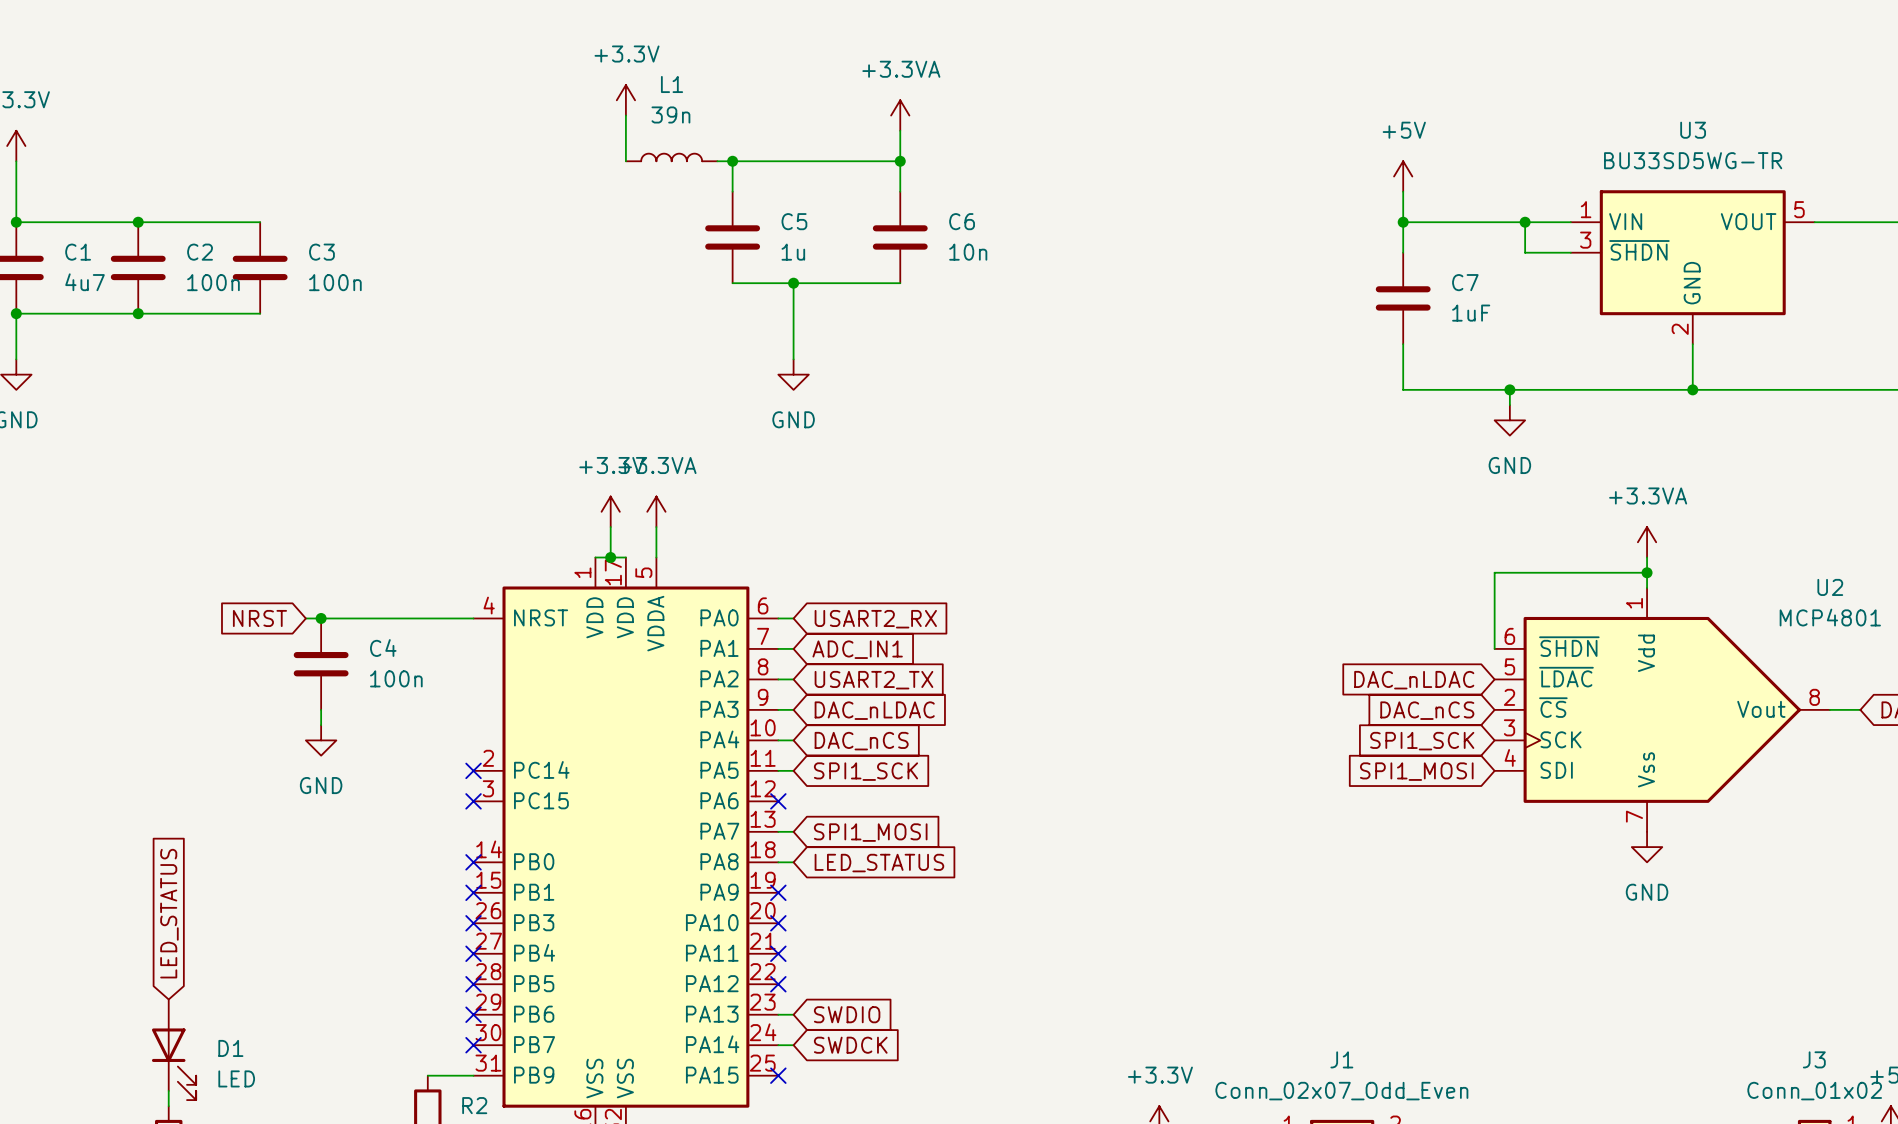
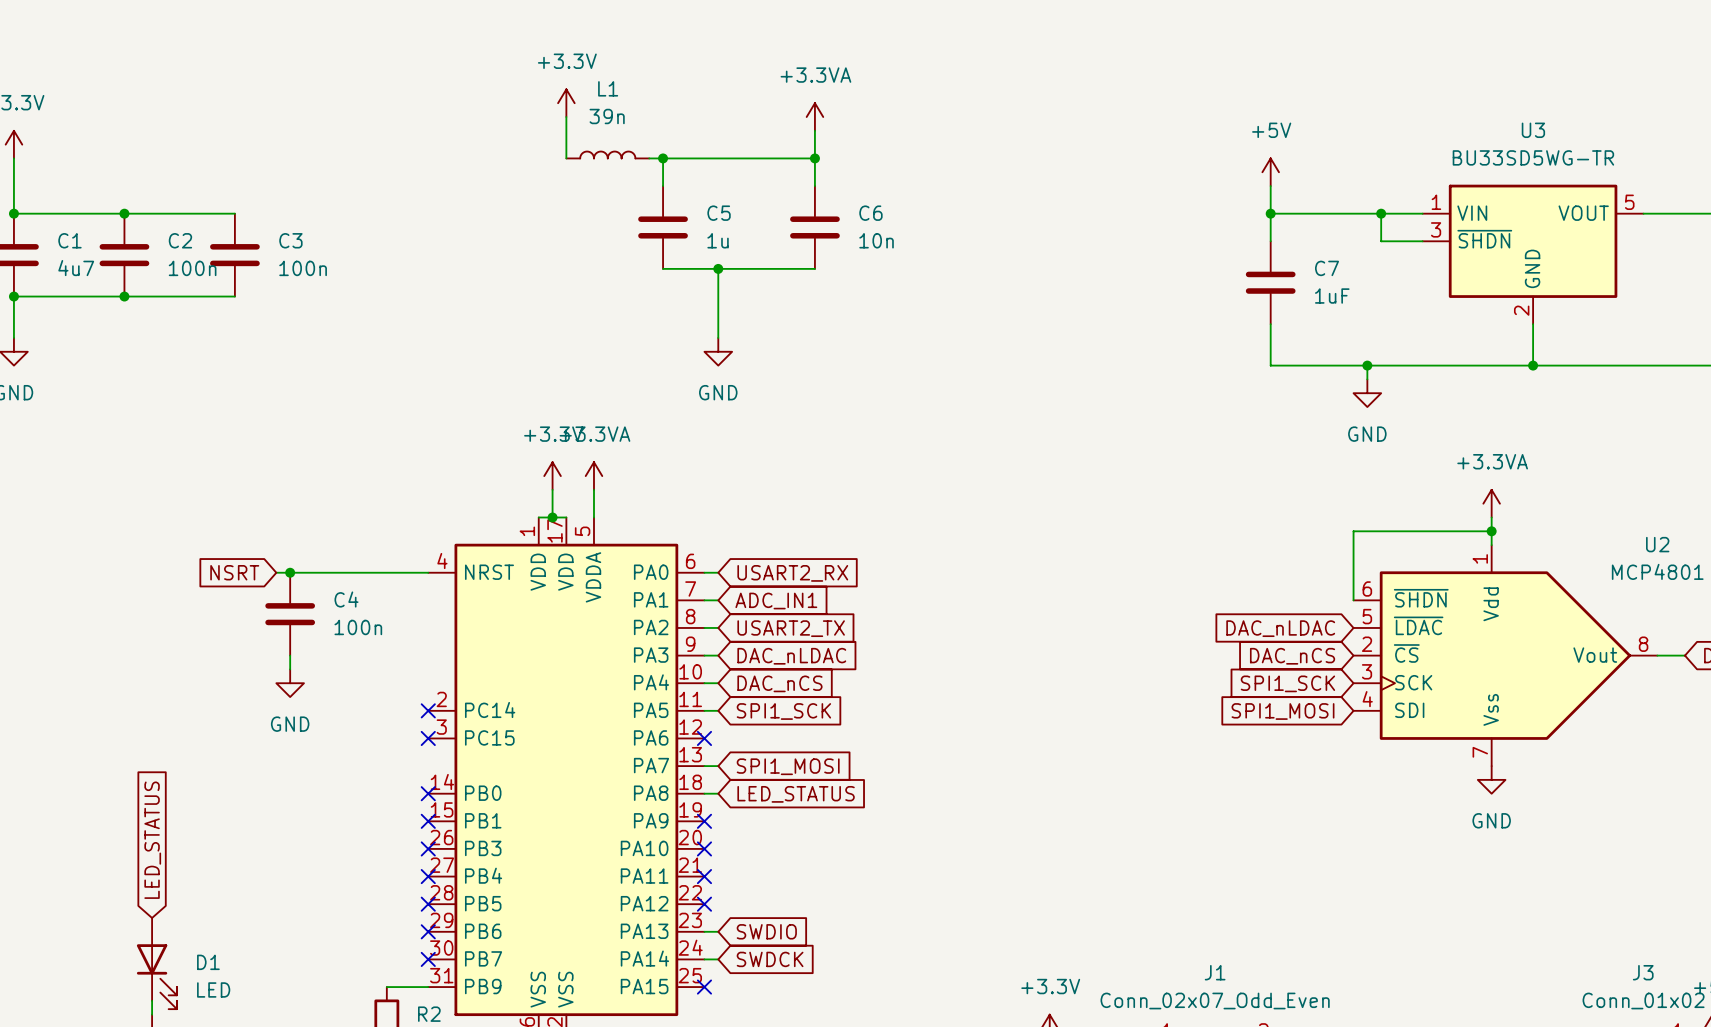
global label: NRST (259, 618) -> NSRT (234, 572)

